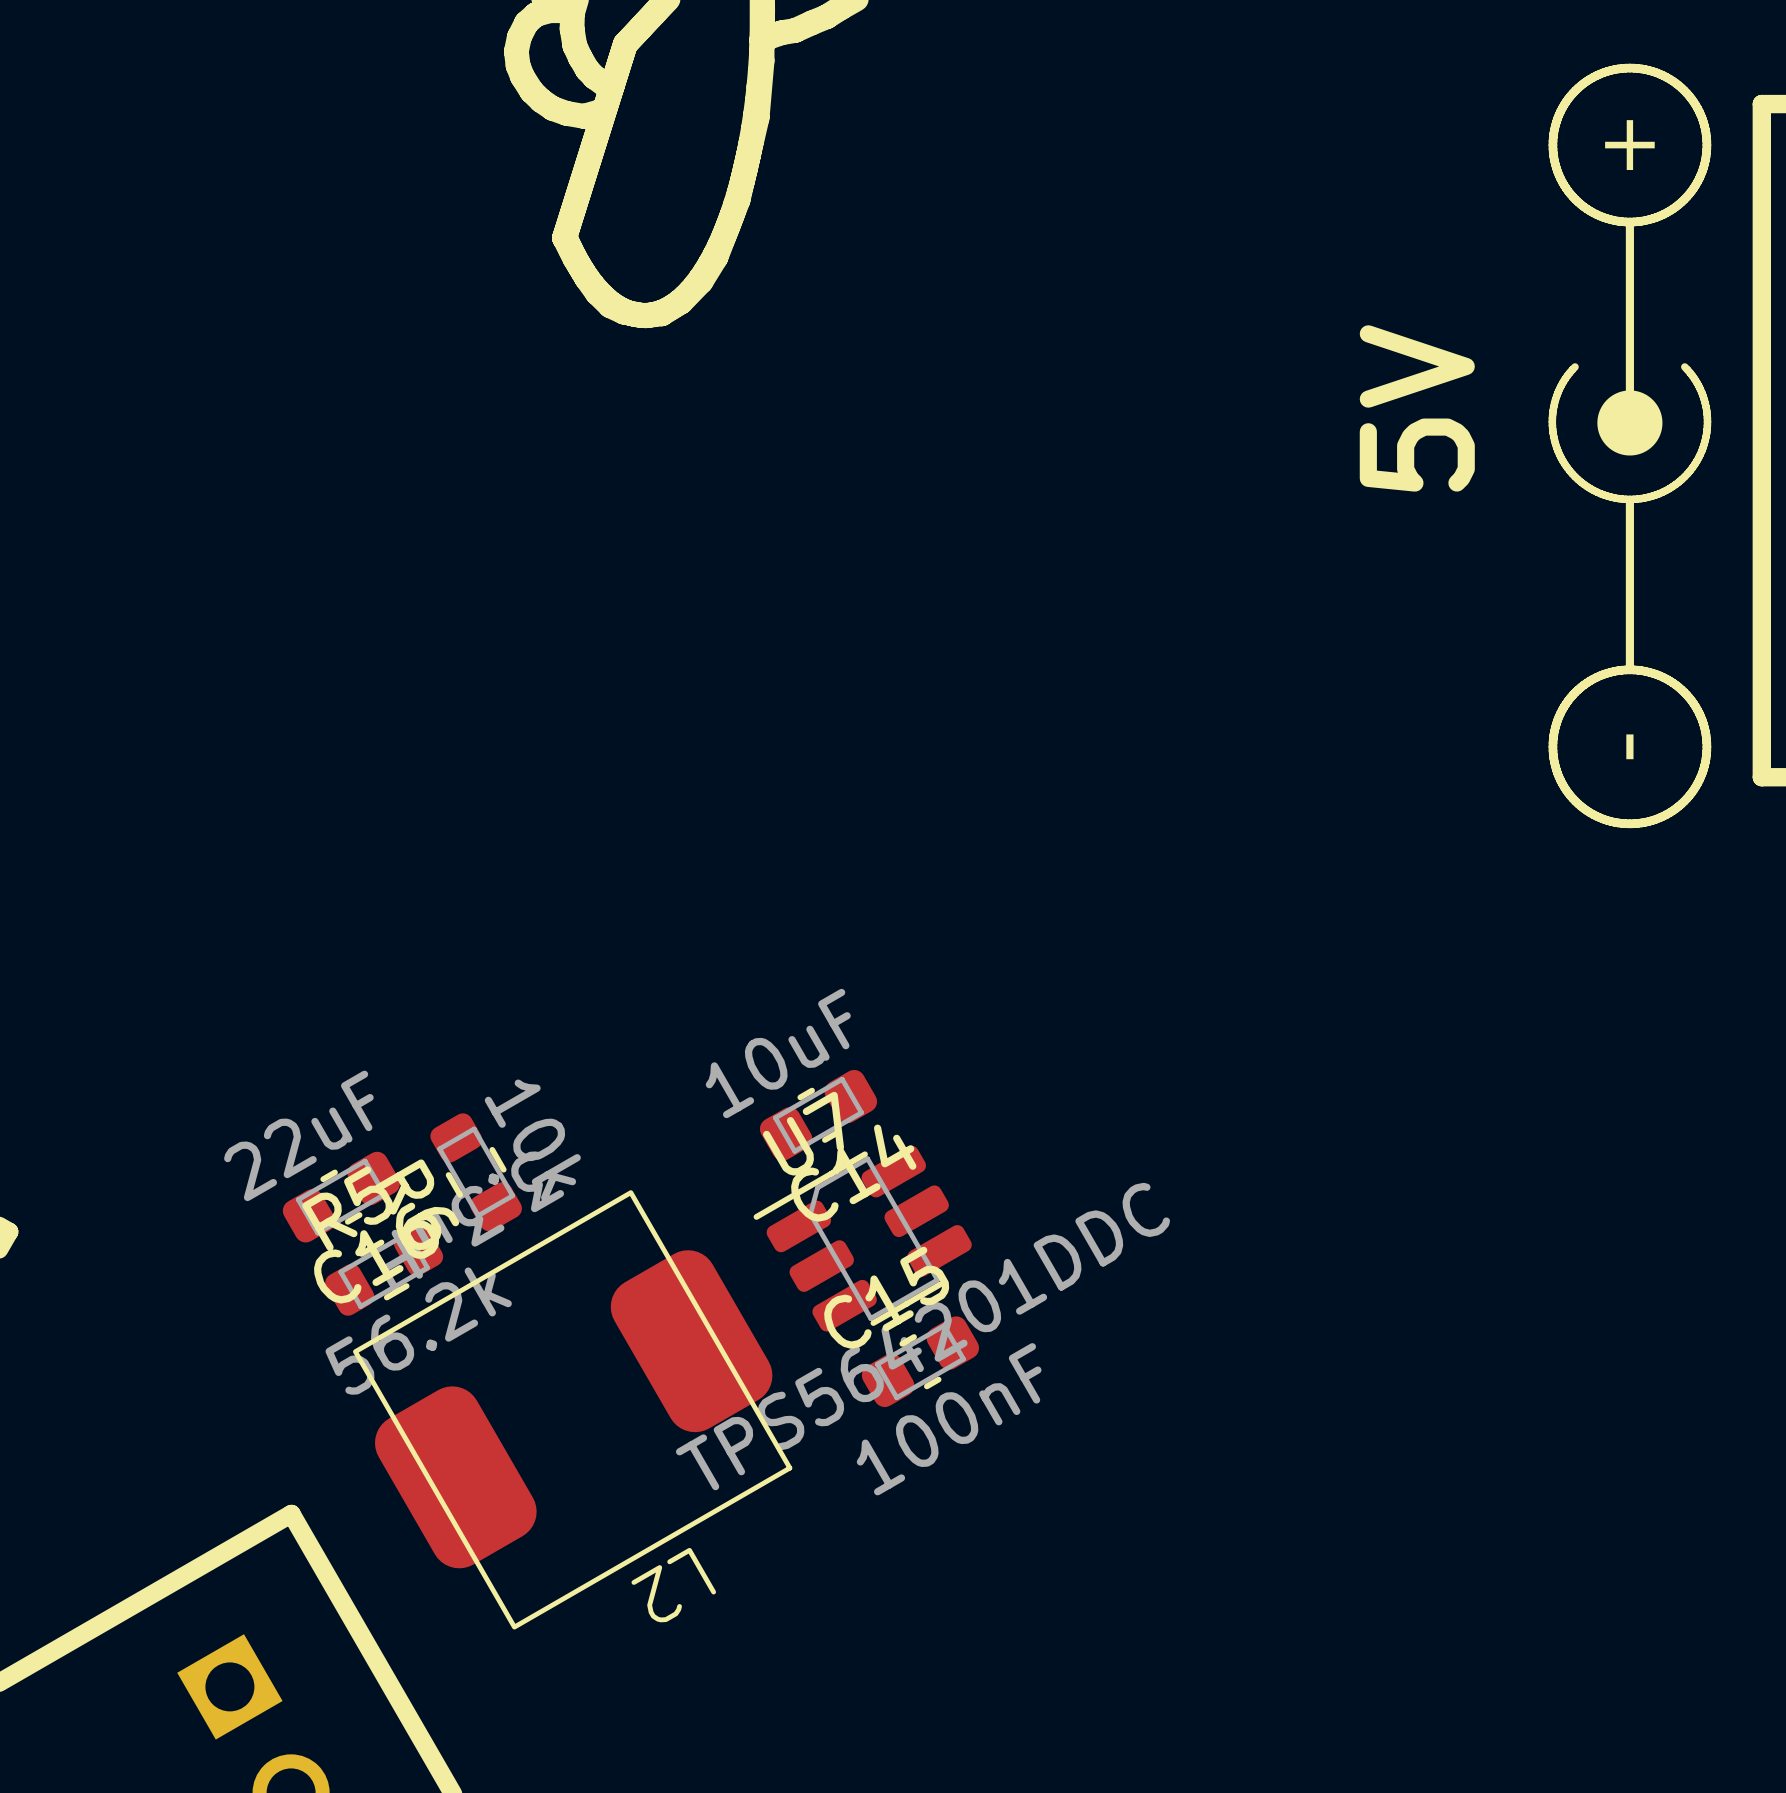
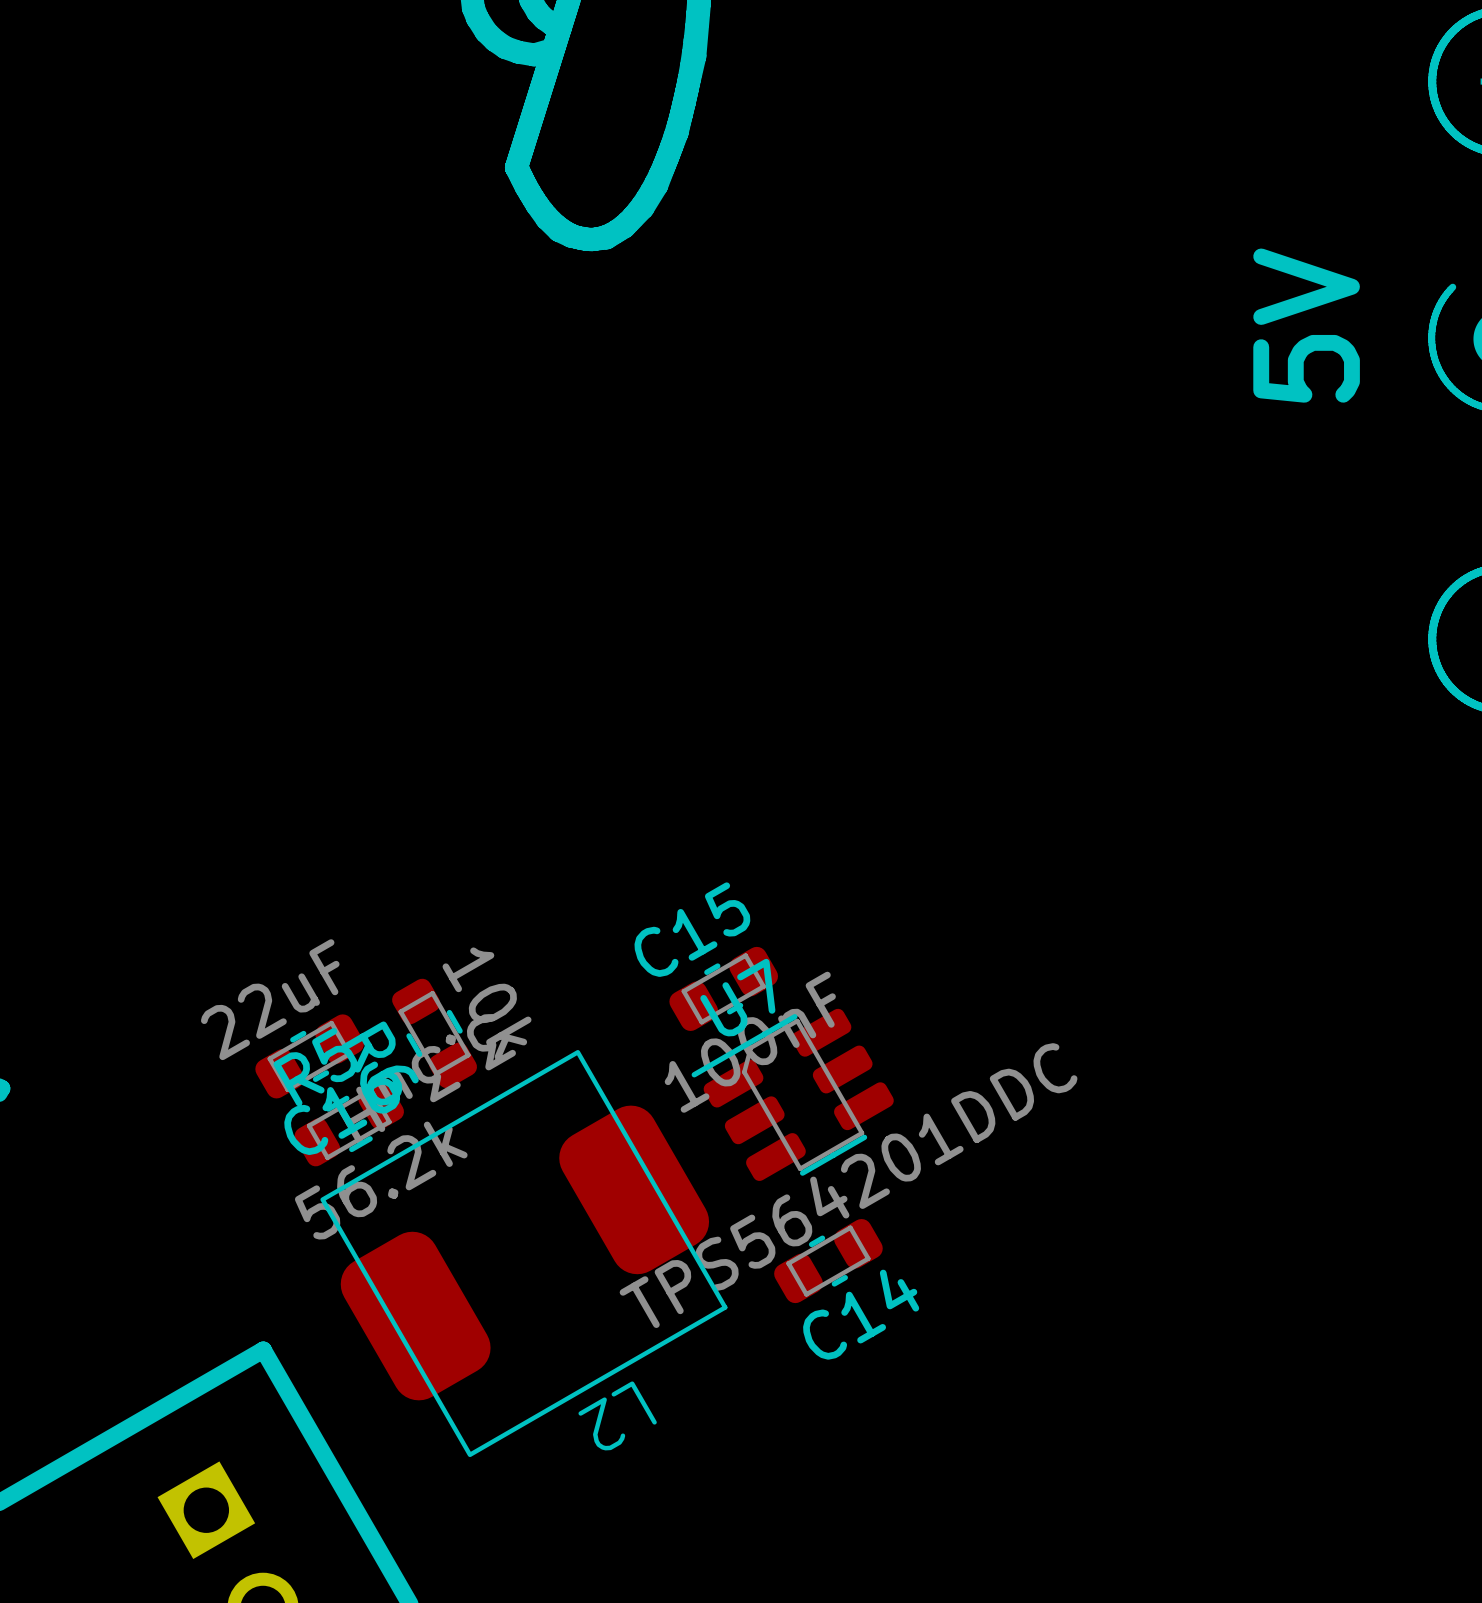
C14 value: 10uF (778, 1053) -> none
C14 position: (818, 1115) -> (828, 1261)
C15 position: (920, 1361) -> (723, 988)

